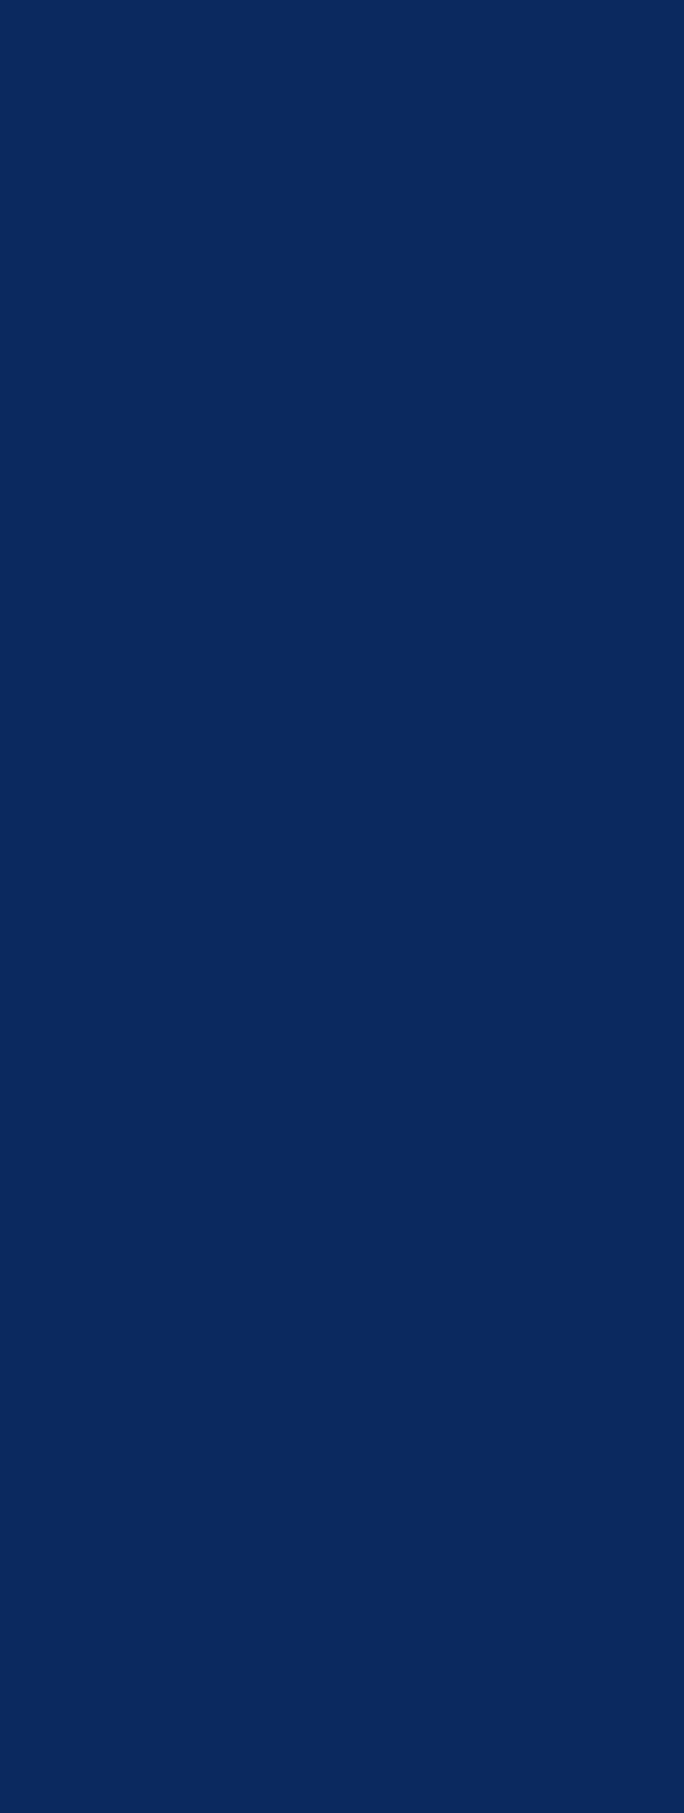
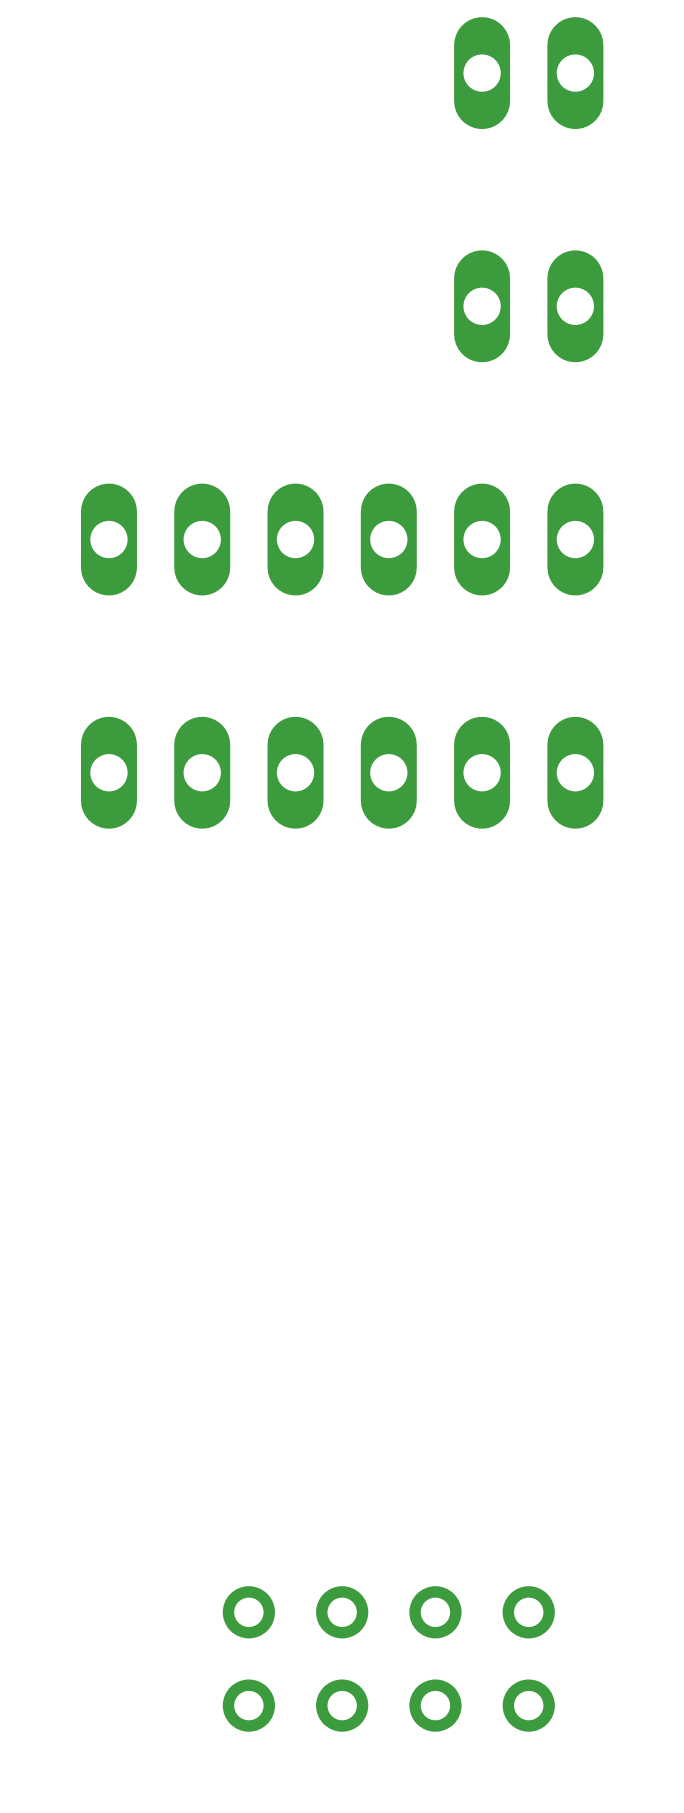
part: none -> (528, 73)
part: none -> (528, 306)
part: none -> (342, 539)
part: none -> (342, 772)
part: none -> (388, 1658)

